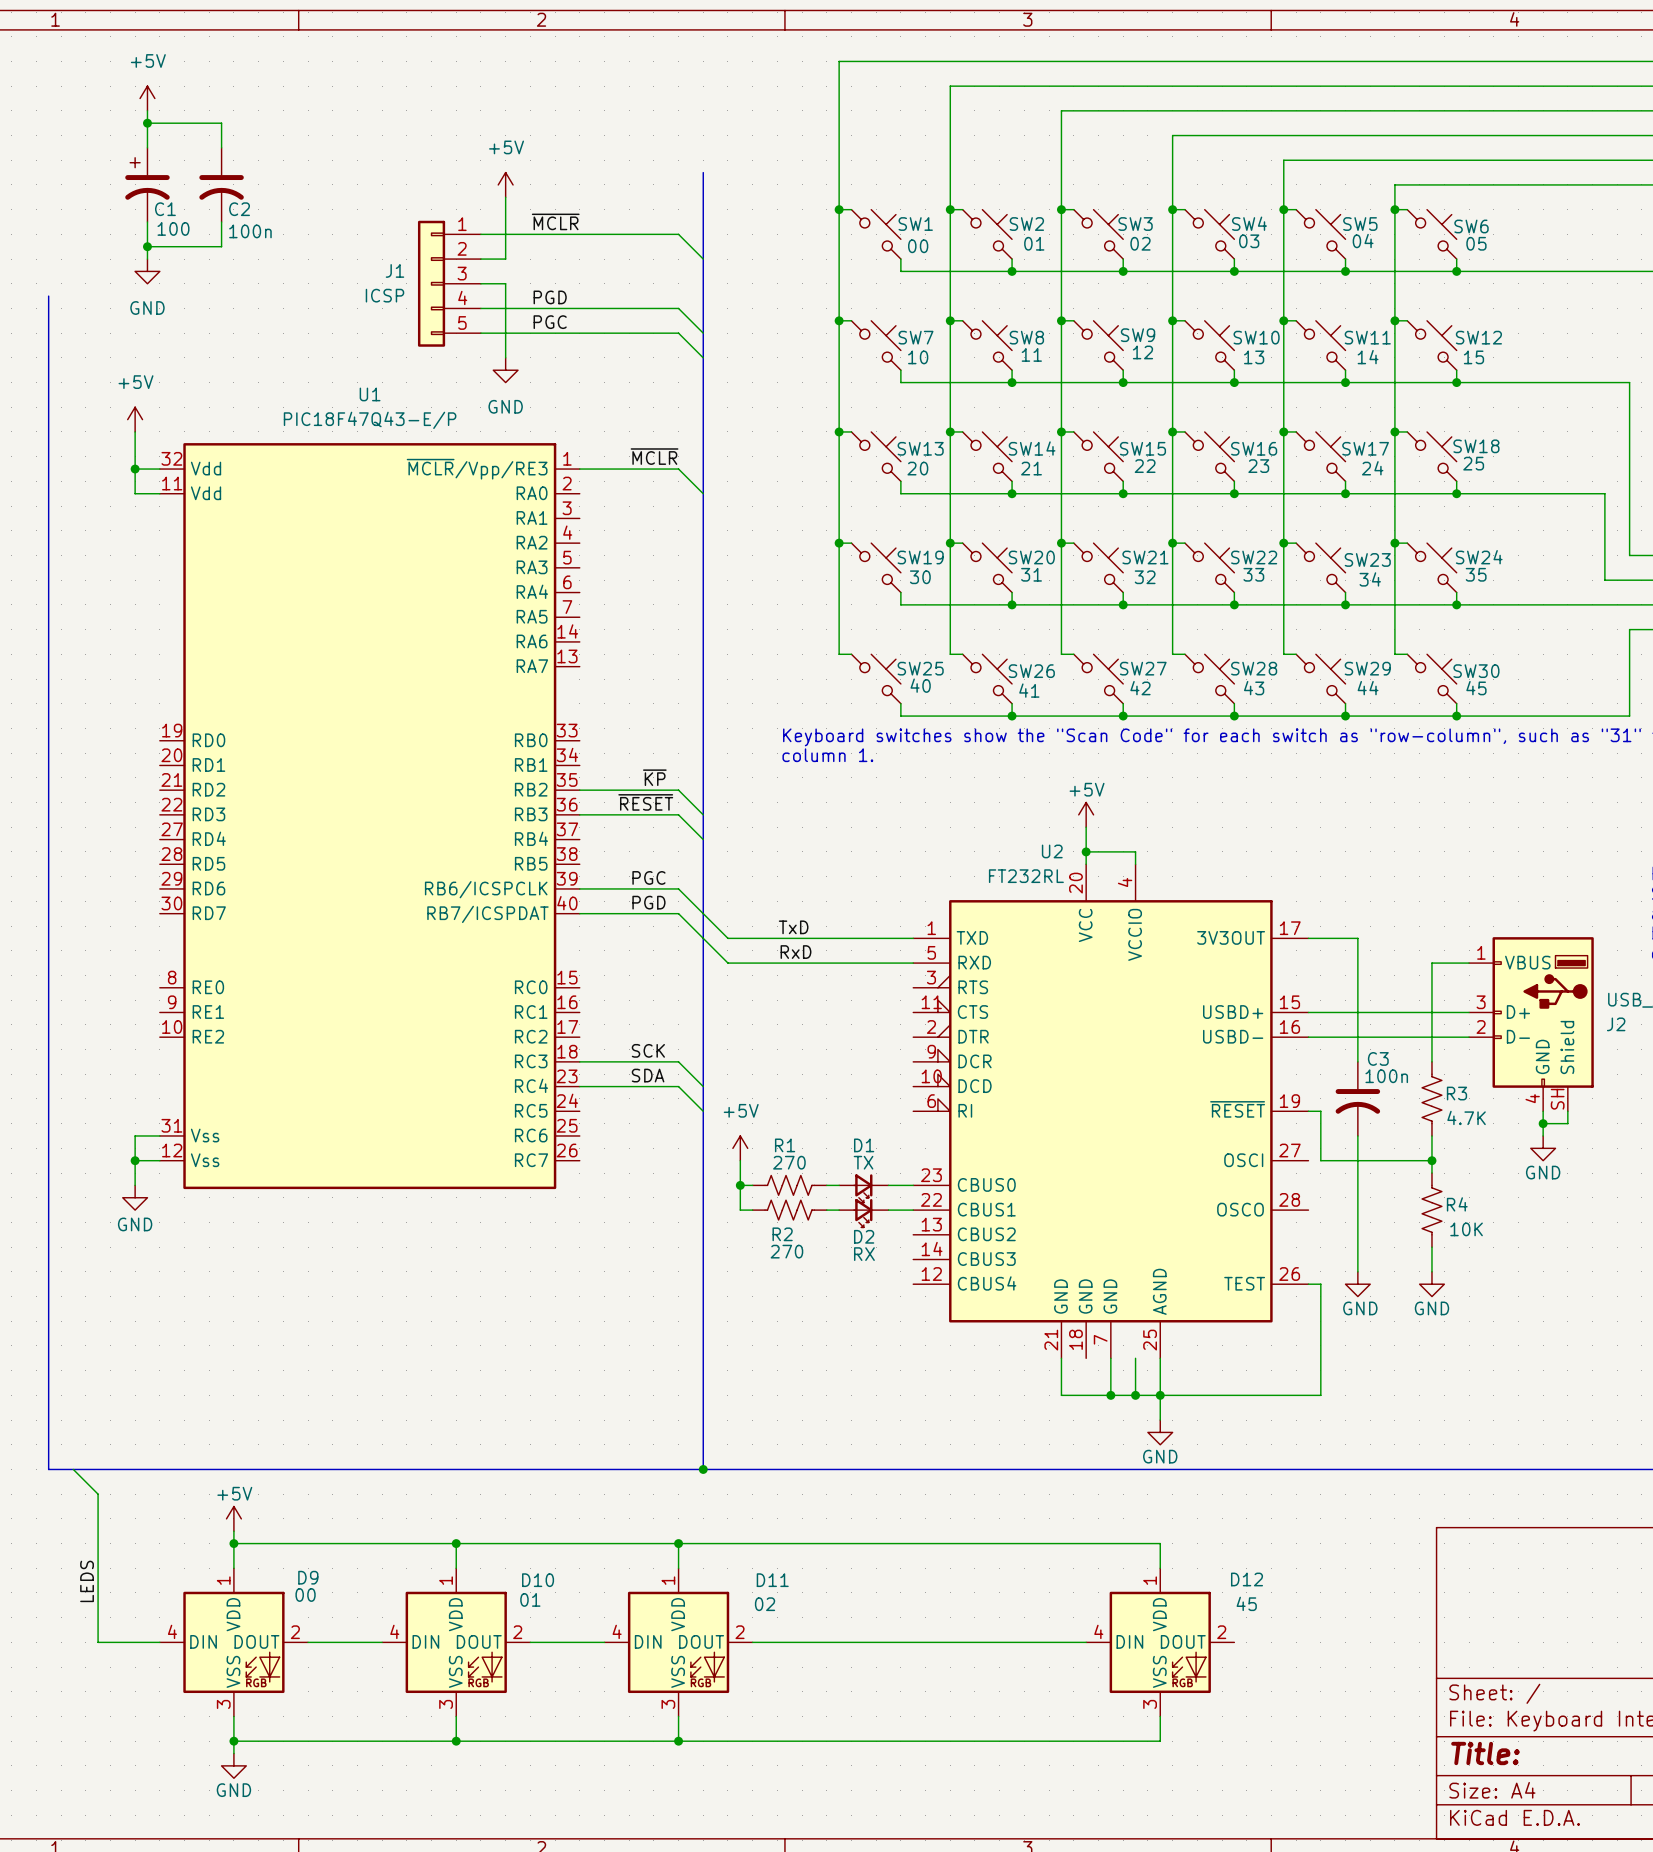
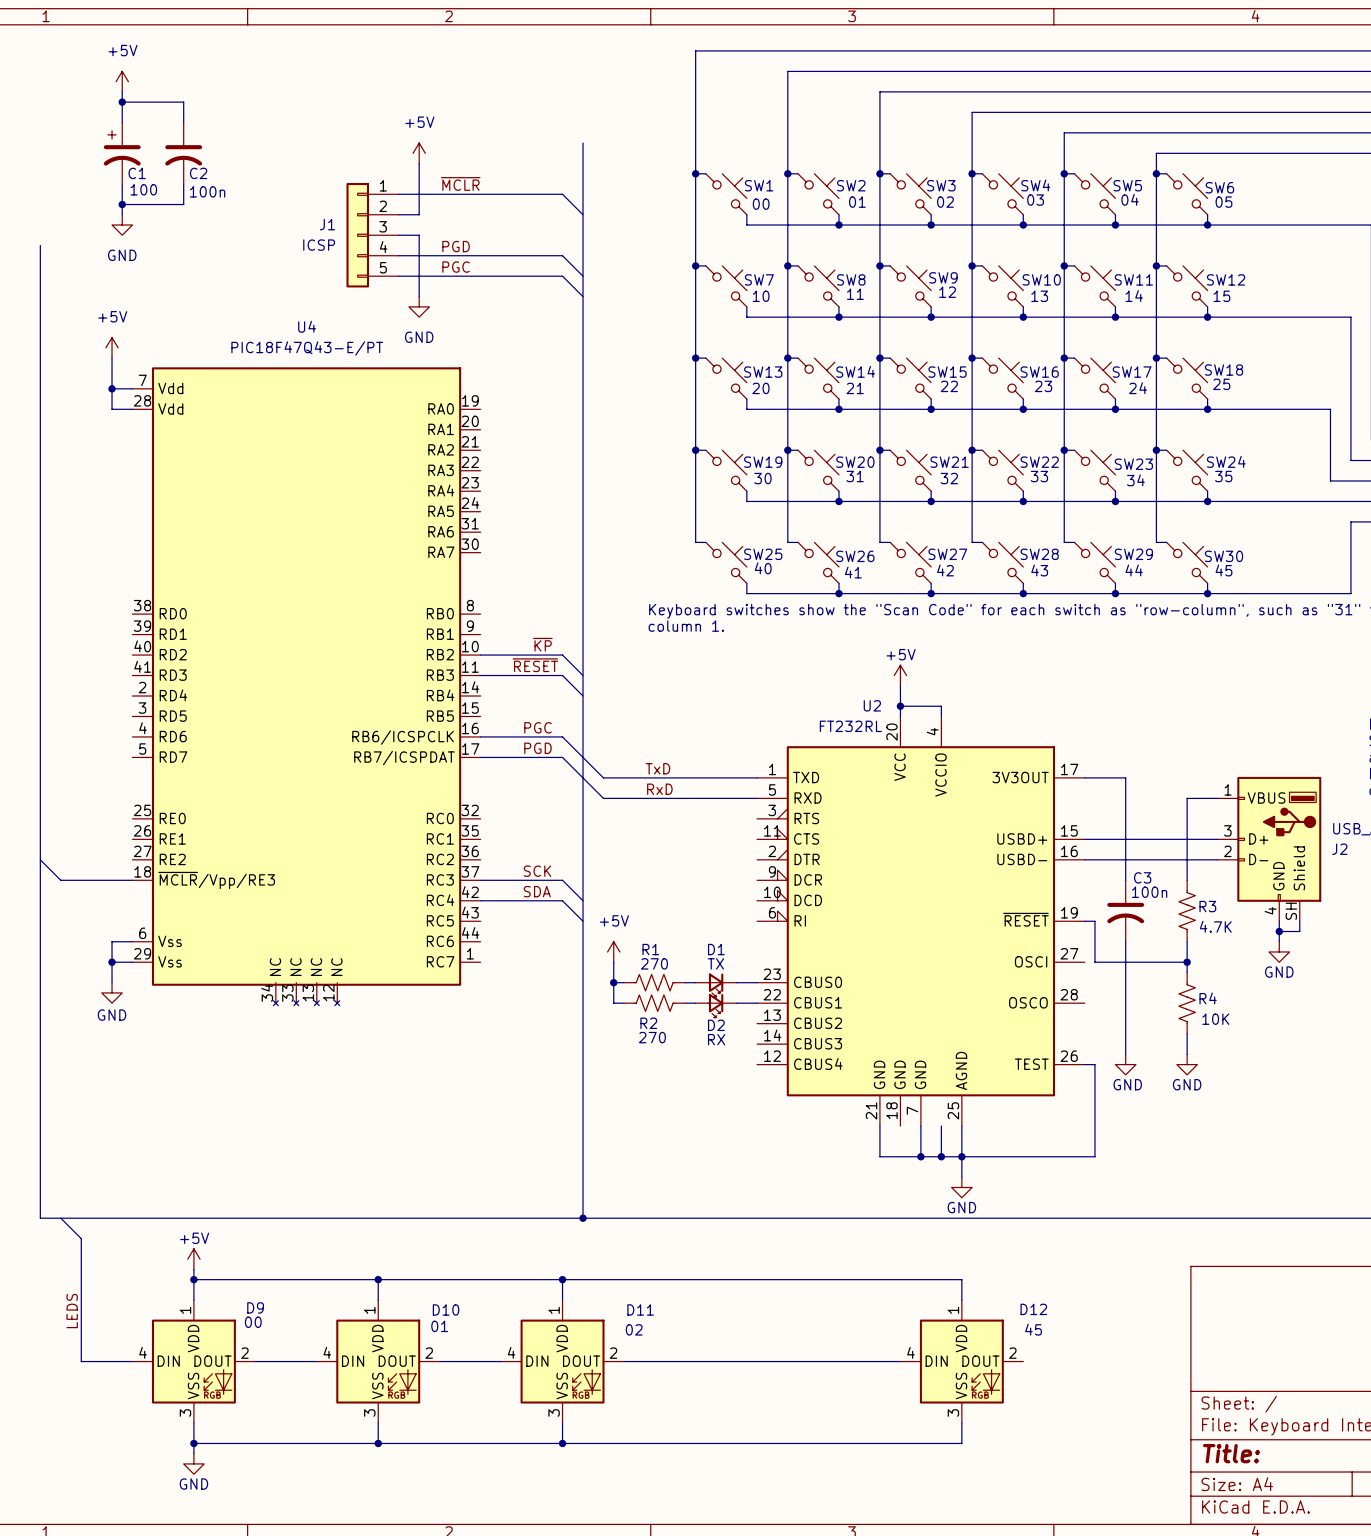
label: ~{MCLR} (654, 456) -> none
wire: (579, 469) (678, 469) (703, 493) -> none
U1: PIC18F47Q43-E/P (369, 816) -> none
U4: none -> PIC18F47Q43-E/PT (306, 686)
wire: none -> (40, 859) (60, 880) (132, 880)

